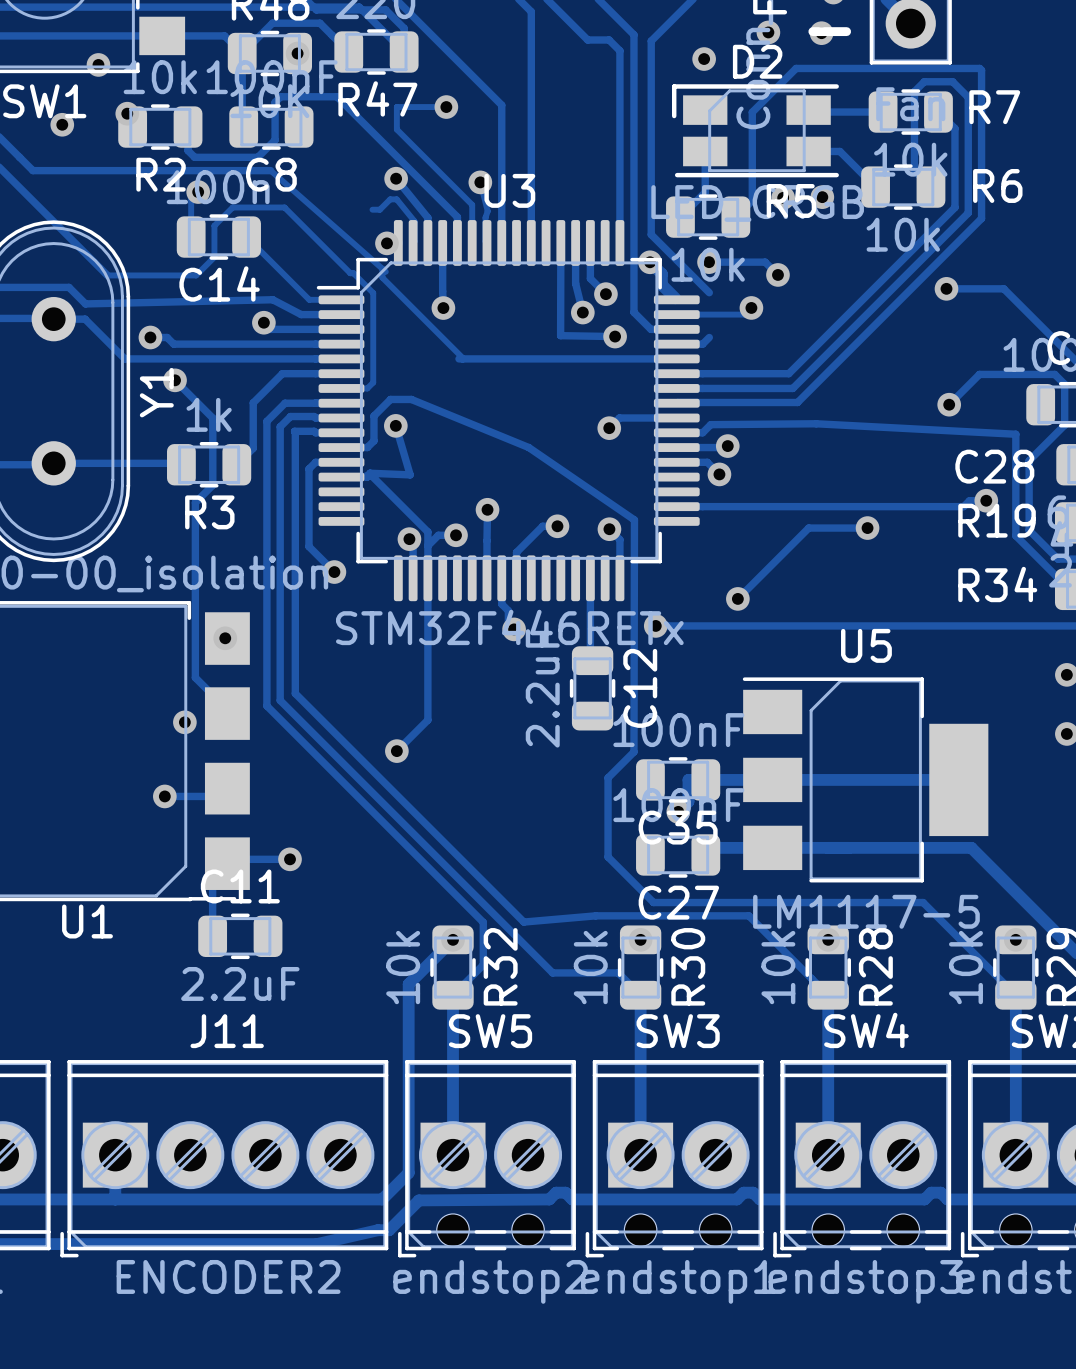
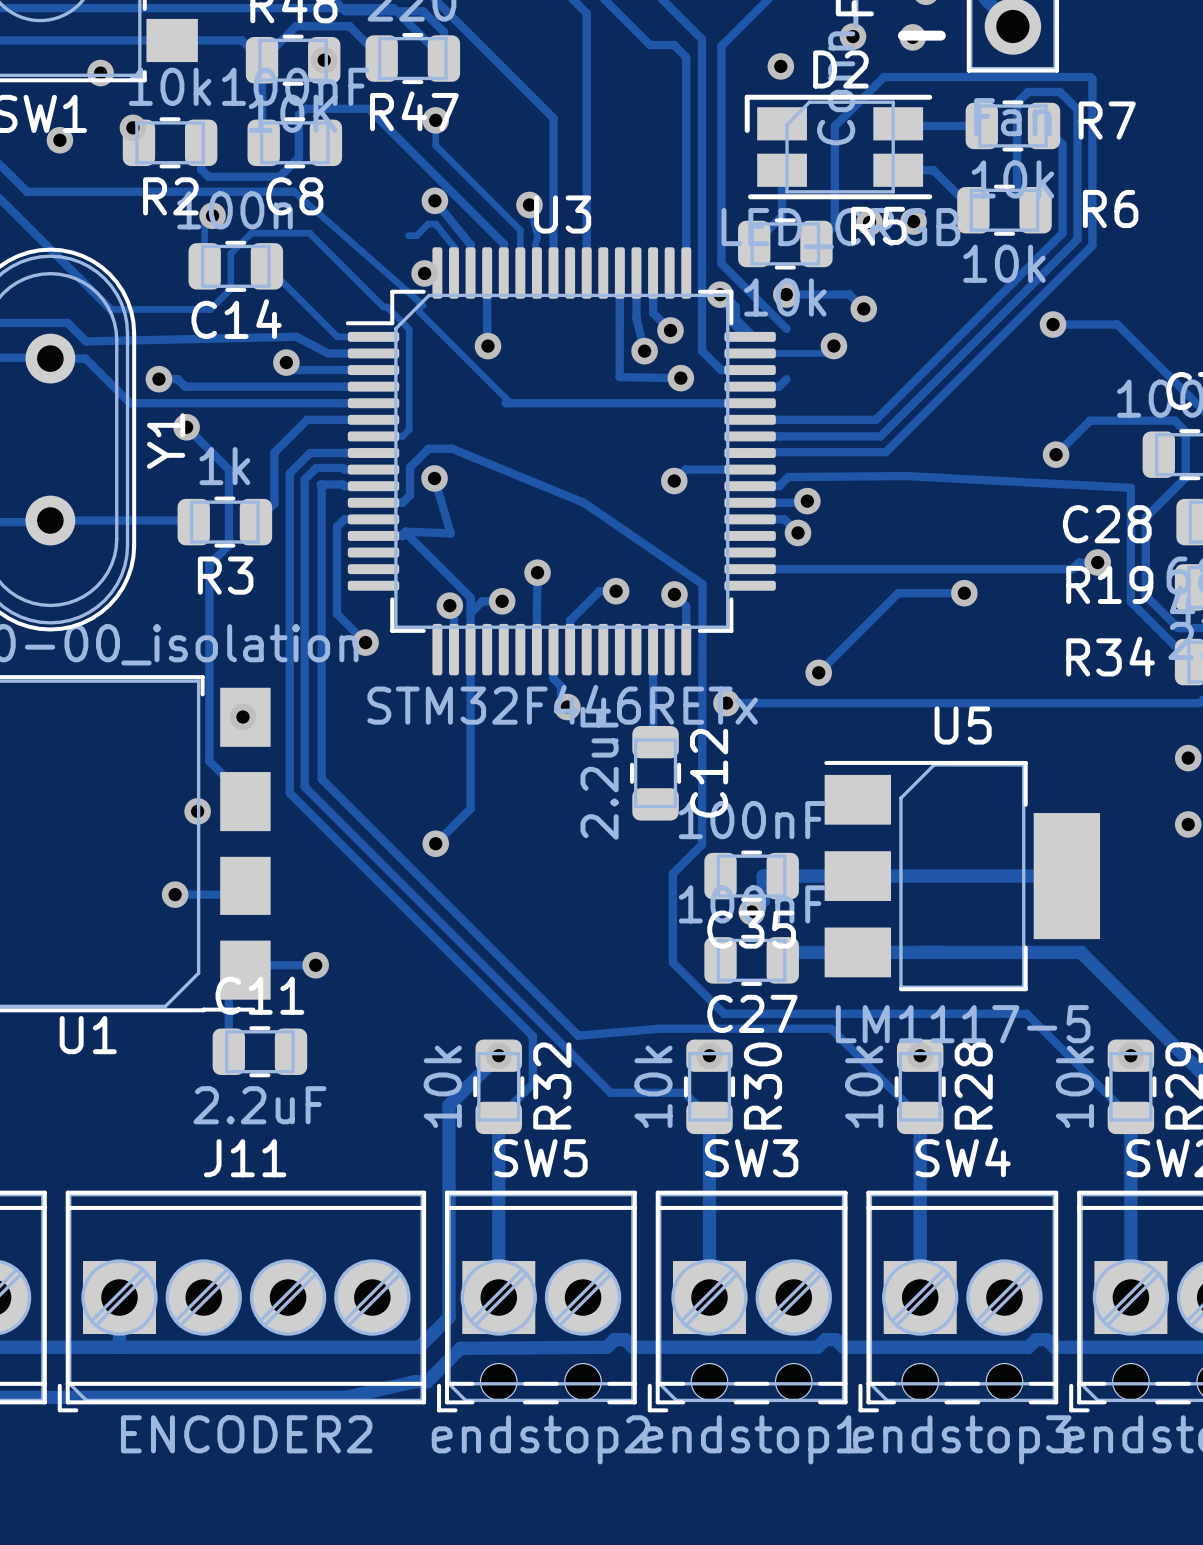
track: (396, 107) (446, 107) -> none
via position: (446, 107) -> (435, 120)

